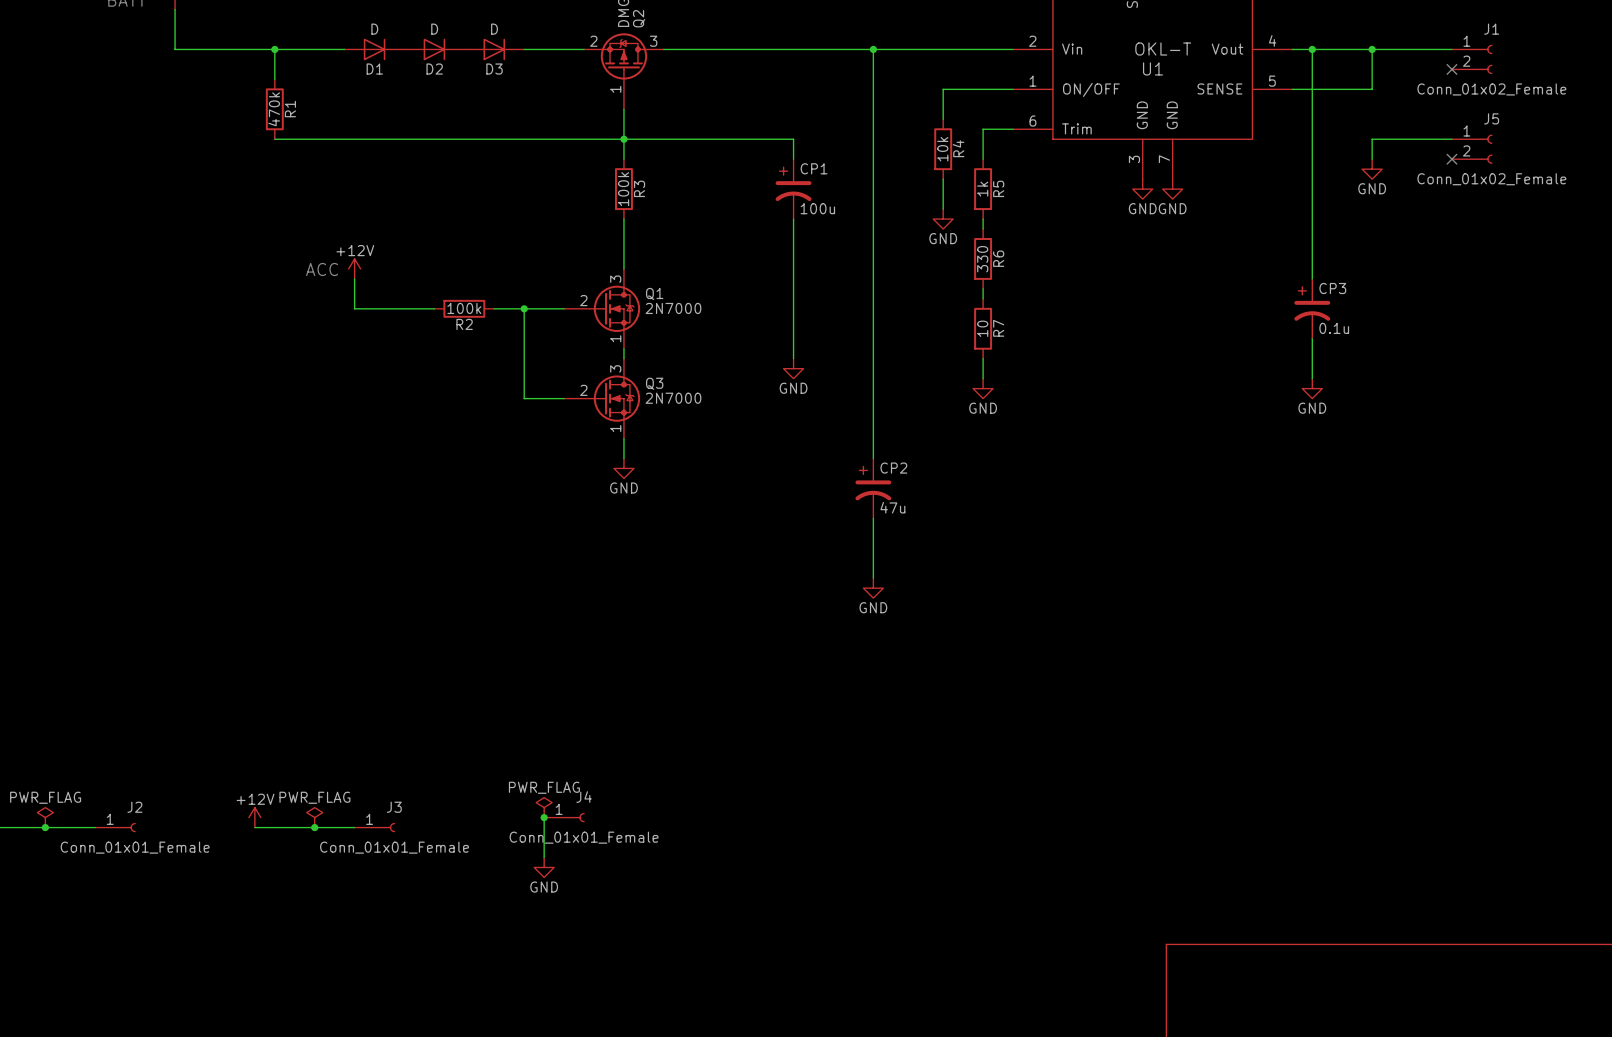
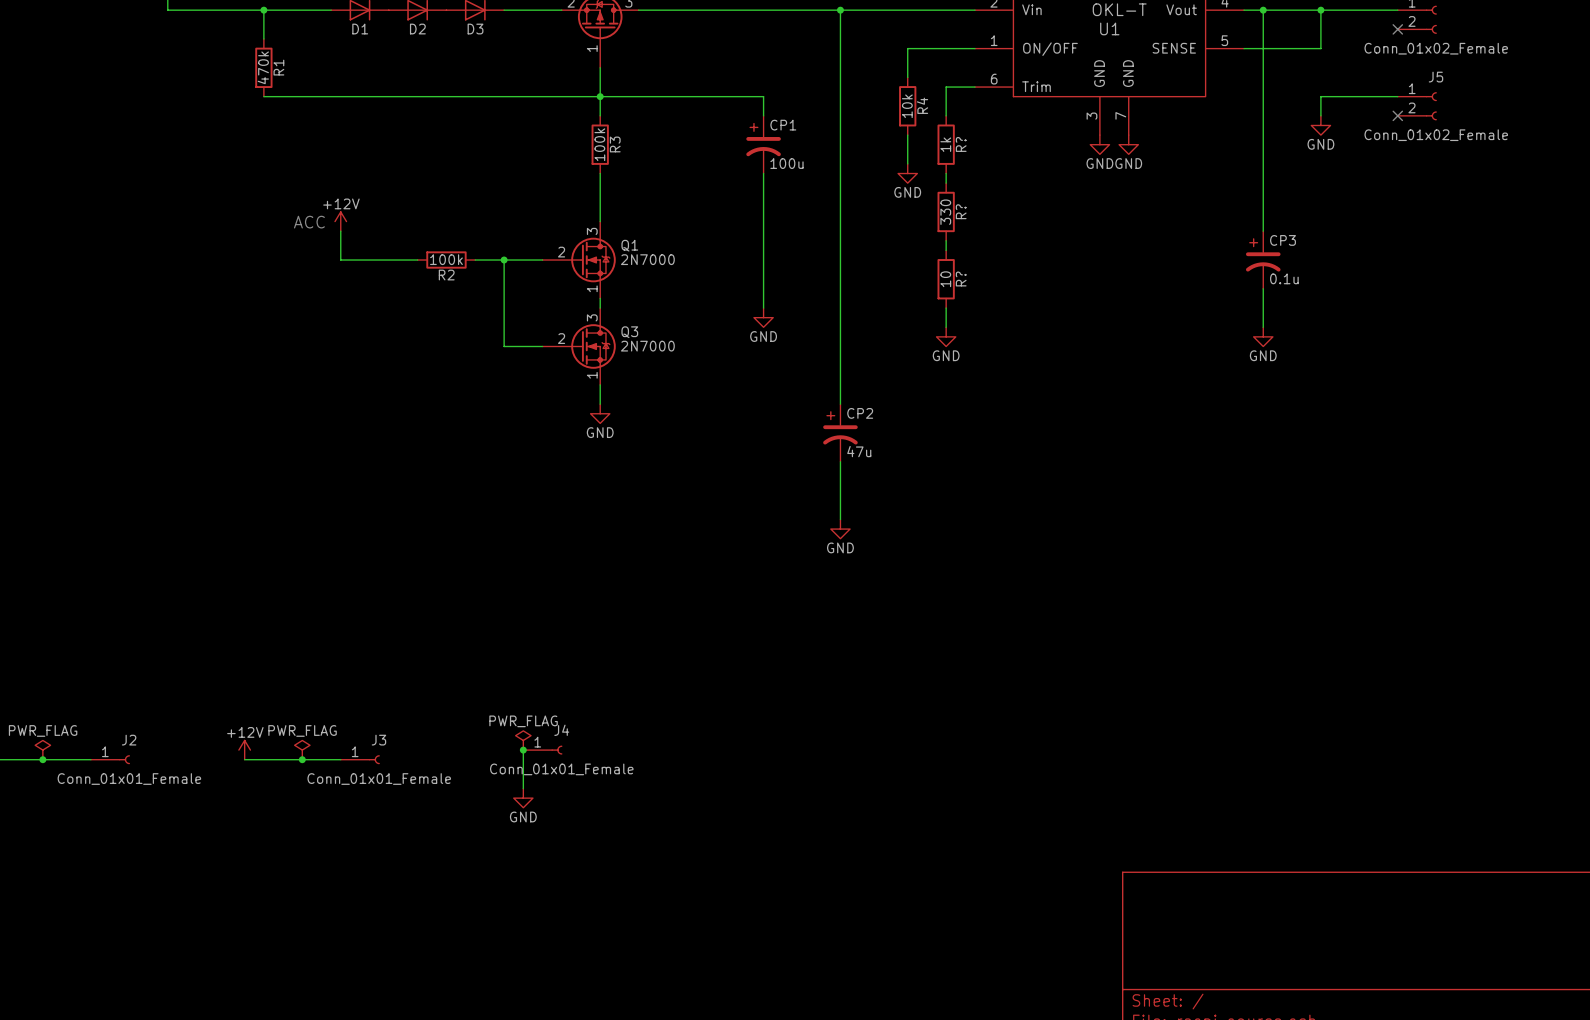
R5 name: R5 (998, 188) -> R? (961, 144)
R6 name: R6 (998, 258) -> R? (961, 211)
R7 name: R7 (998, 328) -> R? (961, 279)

